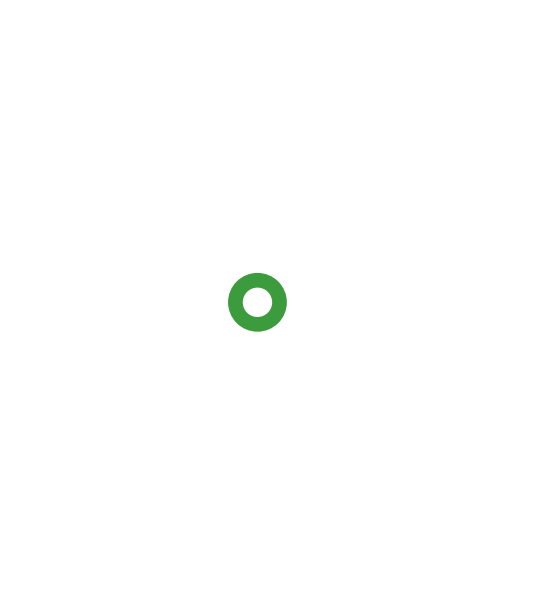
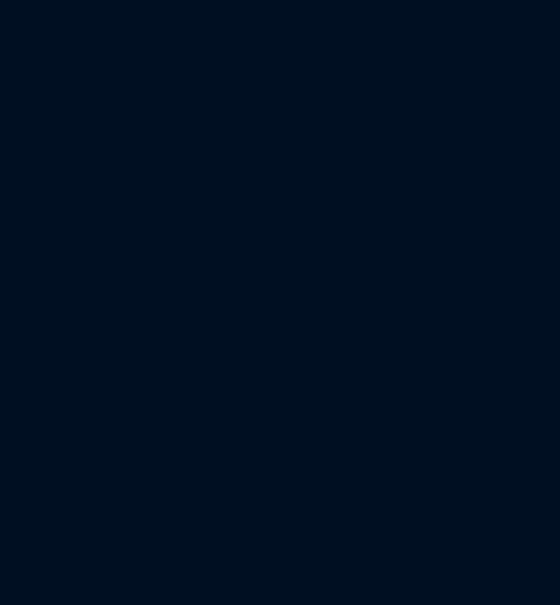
via: (257, 302) -> none

